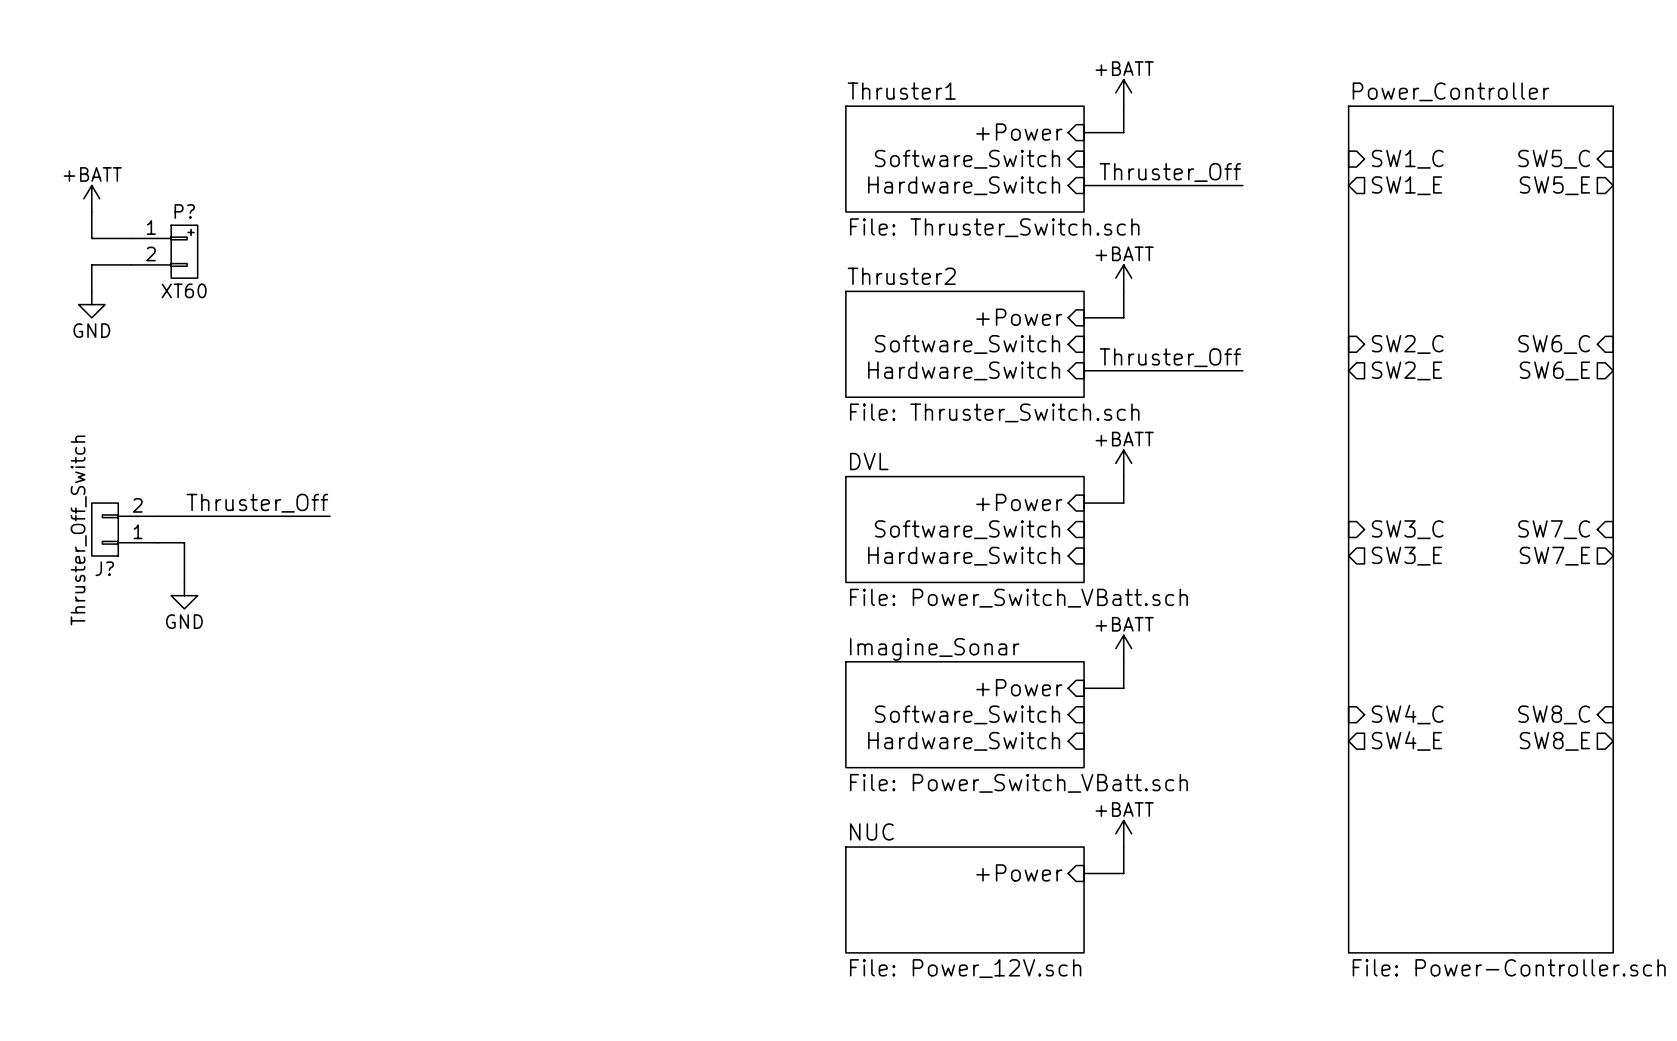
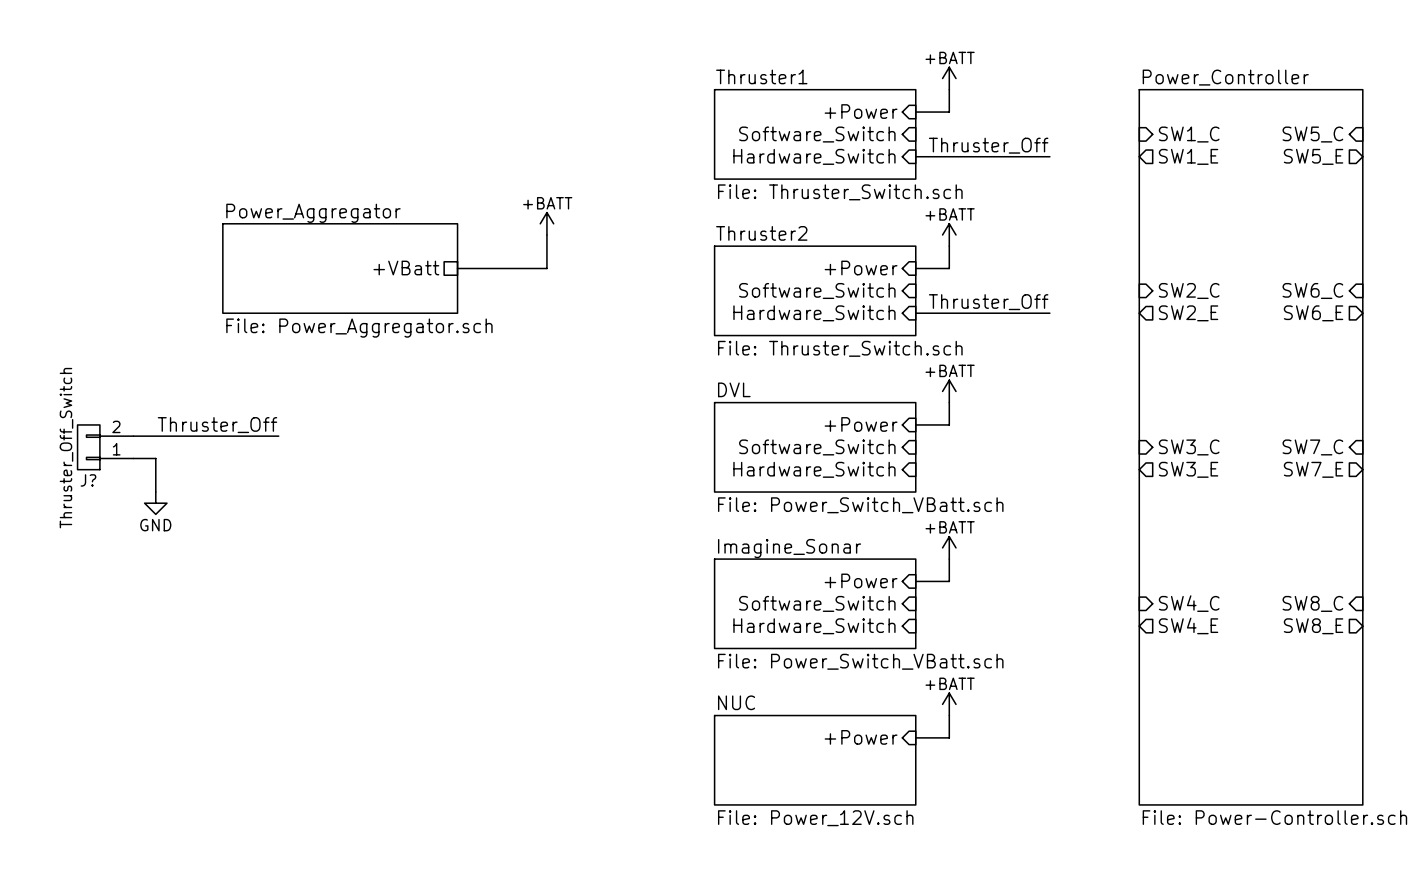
power symbol: +BATT (91, 198) -> none
wire: (91, 212) (91, 238) (131, 238) -> none
P?: XT60 (164, 251) -> none
wire: (131, 264) (91, 264) (91, 291) -> none
power symbol: none -> +BATT (546, 223)
wire: none -> (546, 234) (546, 268) (457, 268)
power symbol: GND (91, 304) -> none
sheet Power_Aggregator: none -> File: Power_Aggregator.sch (340, 268)
sheet pin: none -> +VBatt (406, 268)

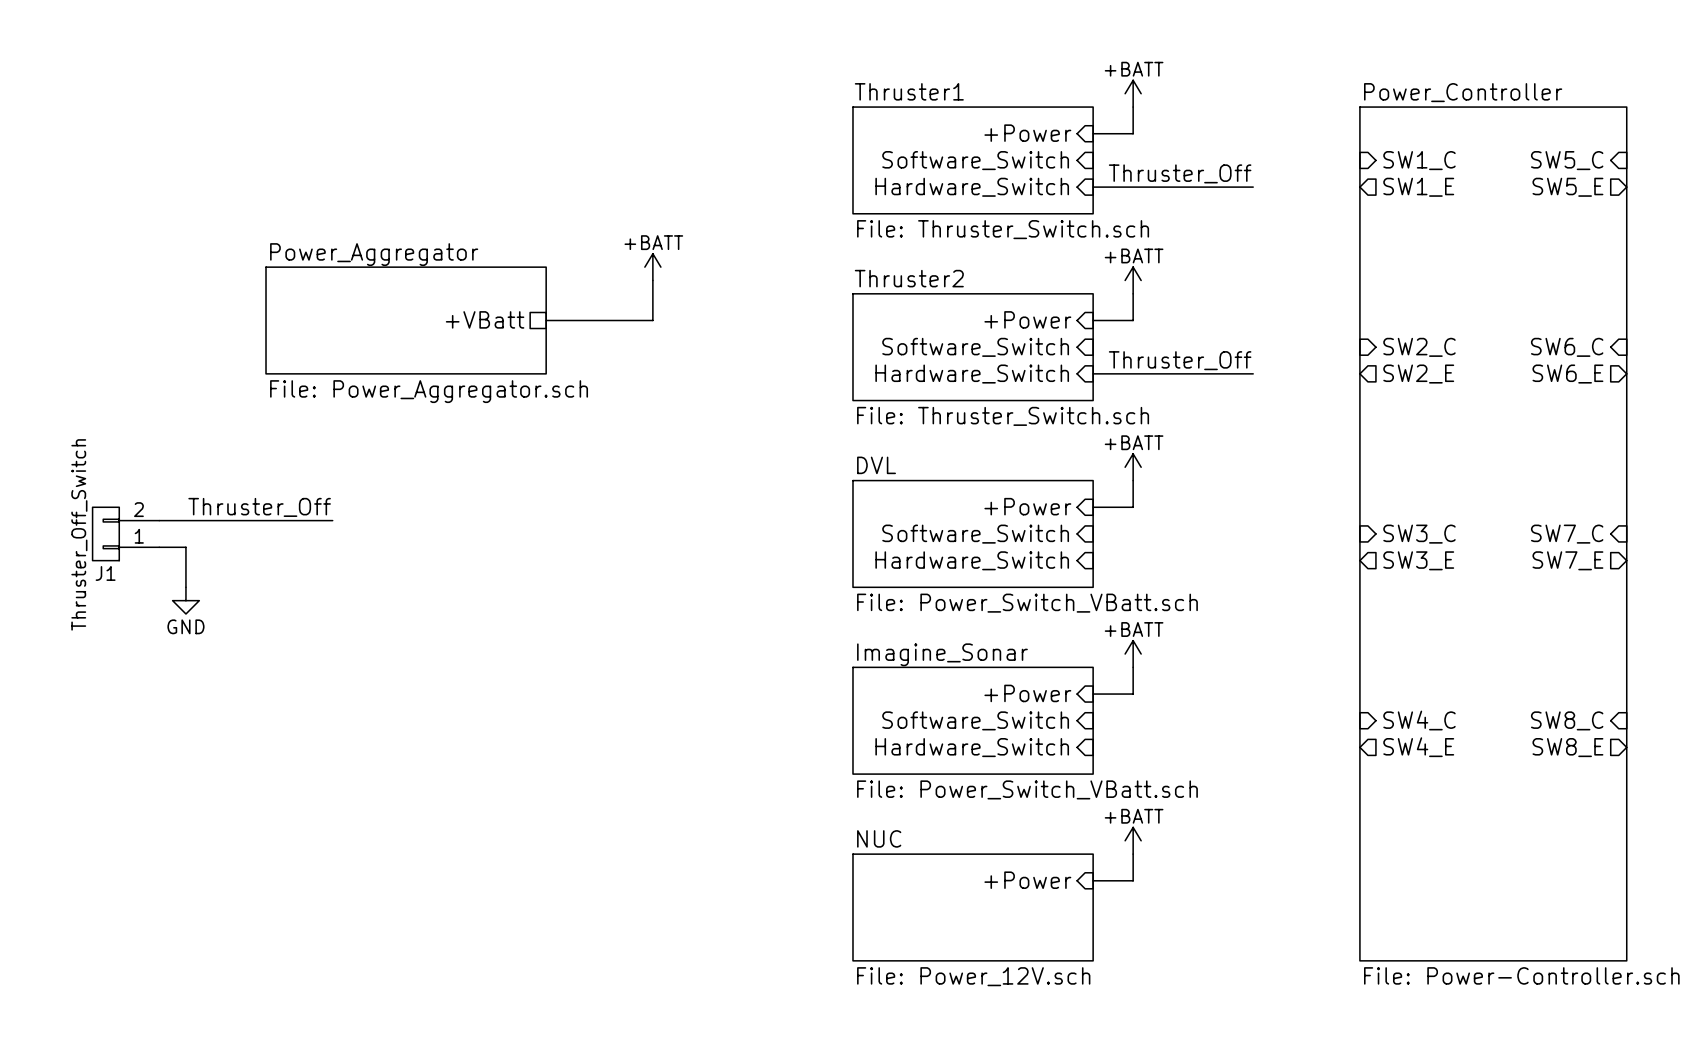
J? name: J? (88, 480) -> J1 (105, 573)

